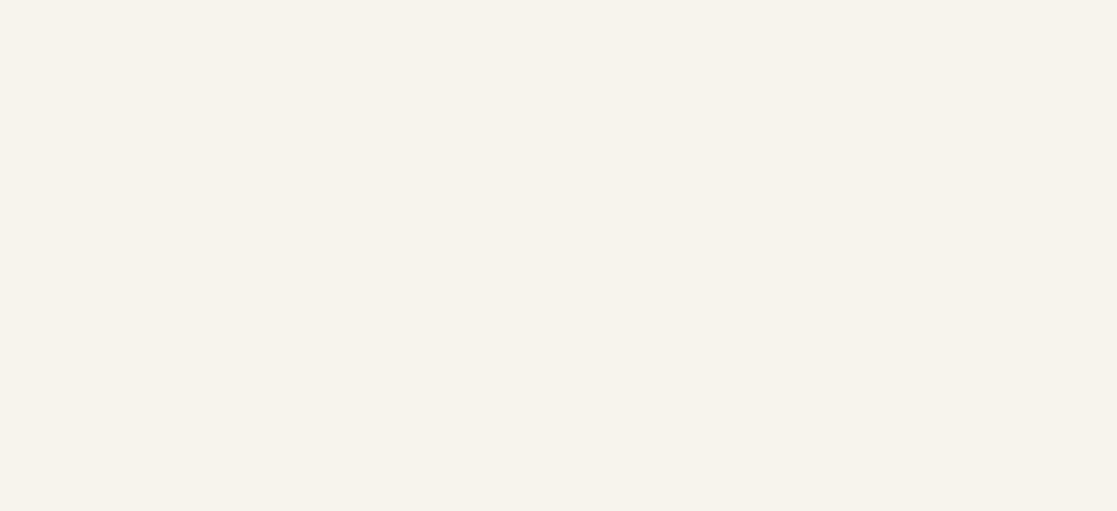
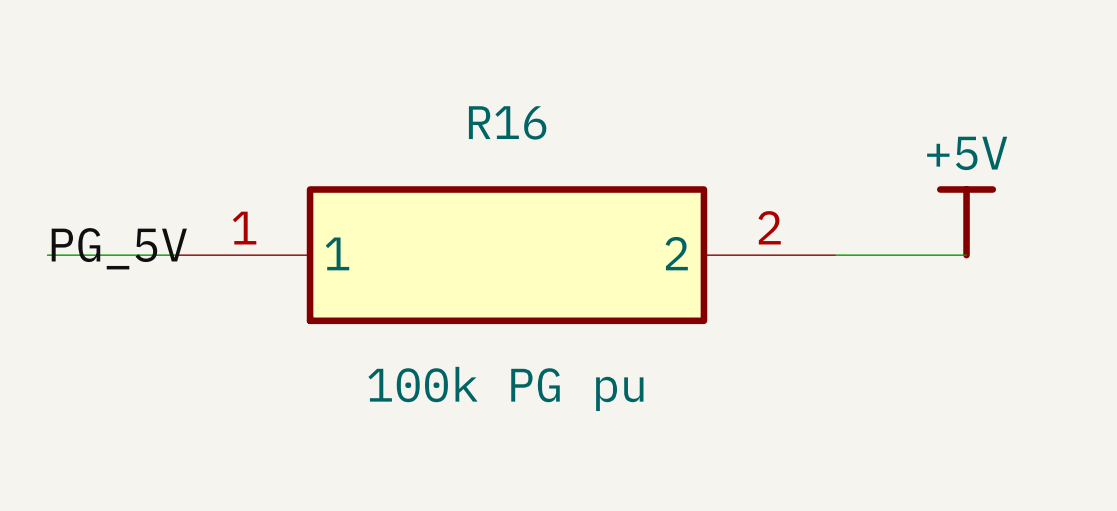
power symbol: none -> +5V (966, 222)
label: none -> PG_5V (119, 248)
wire: none -> (47, 255) (178, 255)
R16: none -> 100k PG pu (507, 255)
wire: none -> (835, 255) (966, 255)

